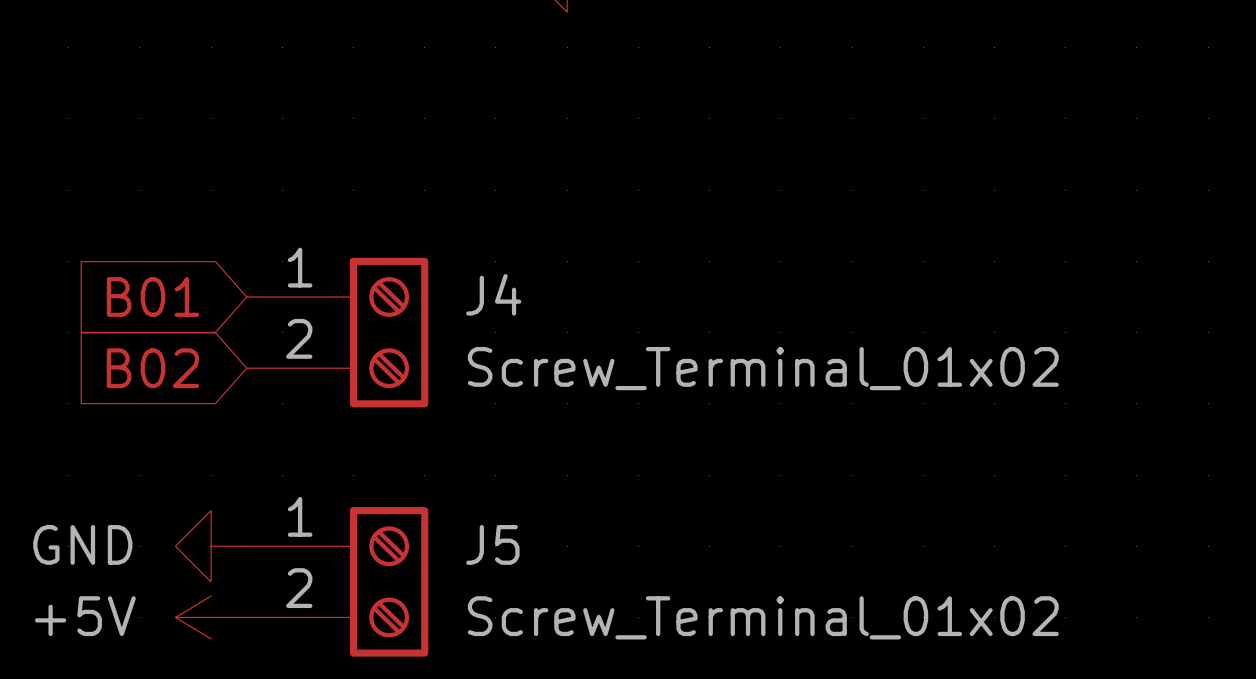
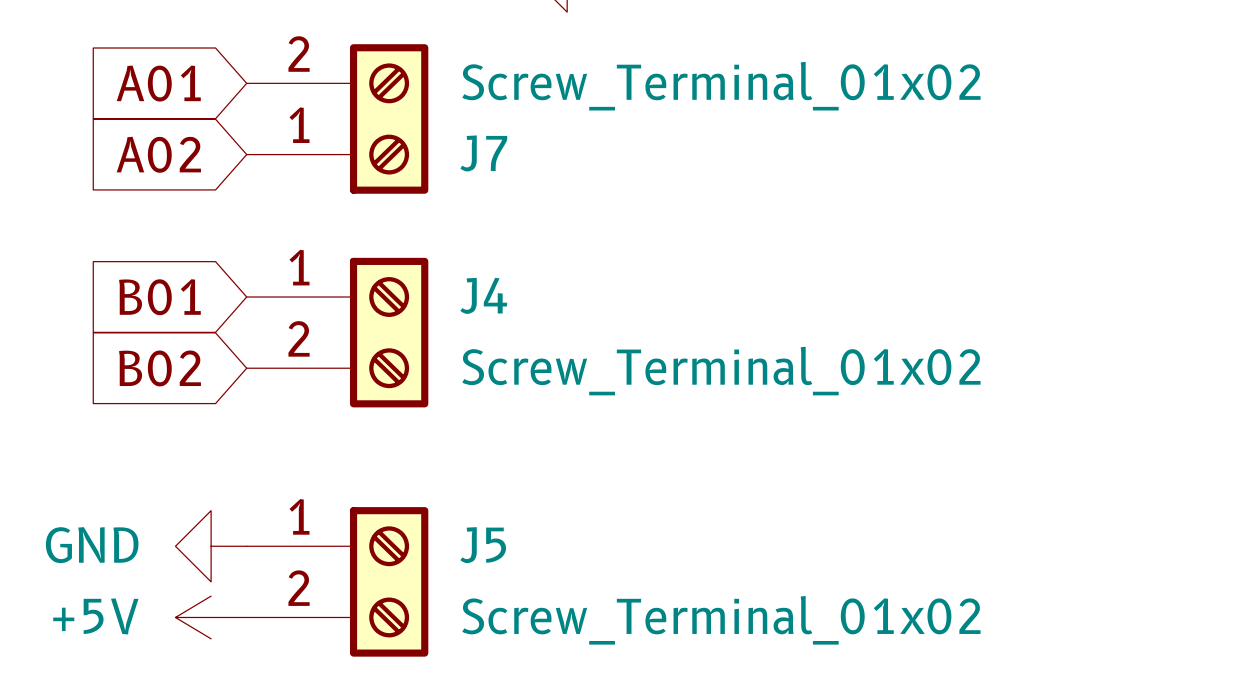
global label: none -> A01 (158, 83)
J7: none -> Screw_Terminal_01x02 (337, 118)
global label: none -> A02 (158, 154)

